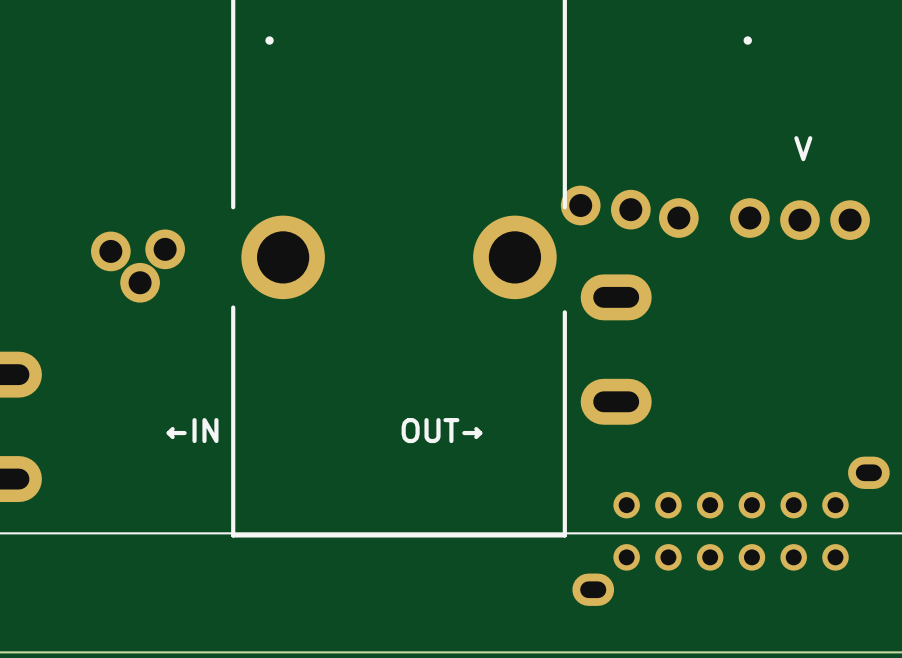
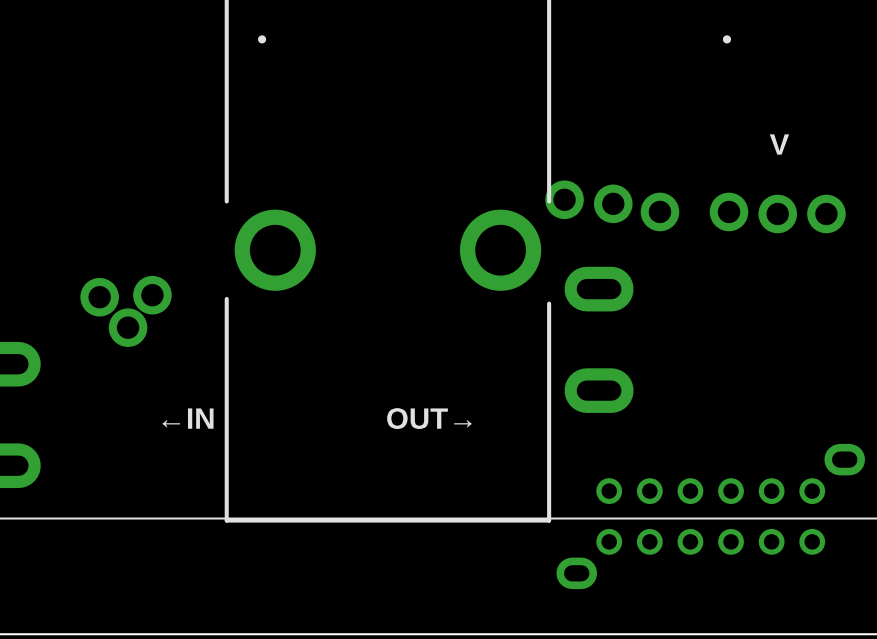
part: (165, 249) -> none
part: (110, 251) -> none
part: (140, 282) -> none
part: none -> (152, 295)
part: none -> (99, 297)
part: none -> (128, 327)

